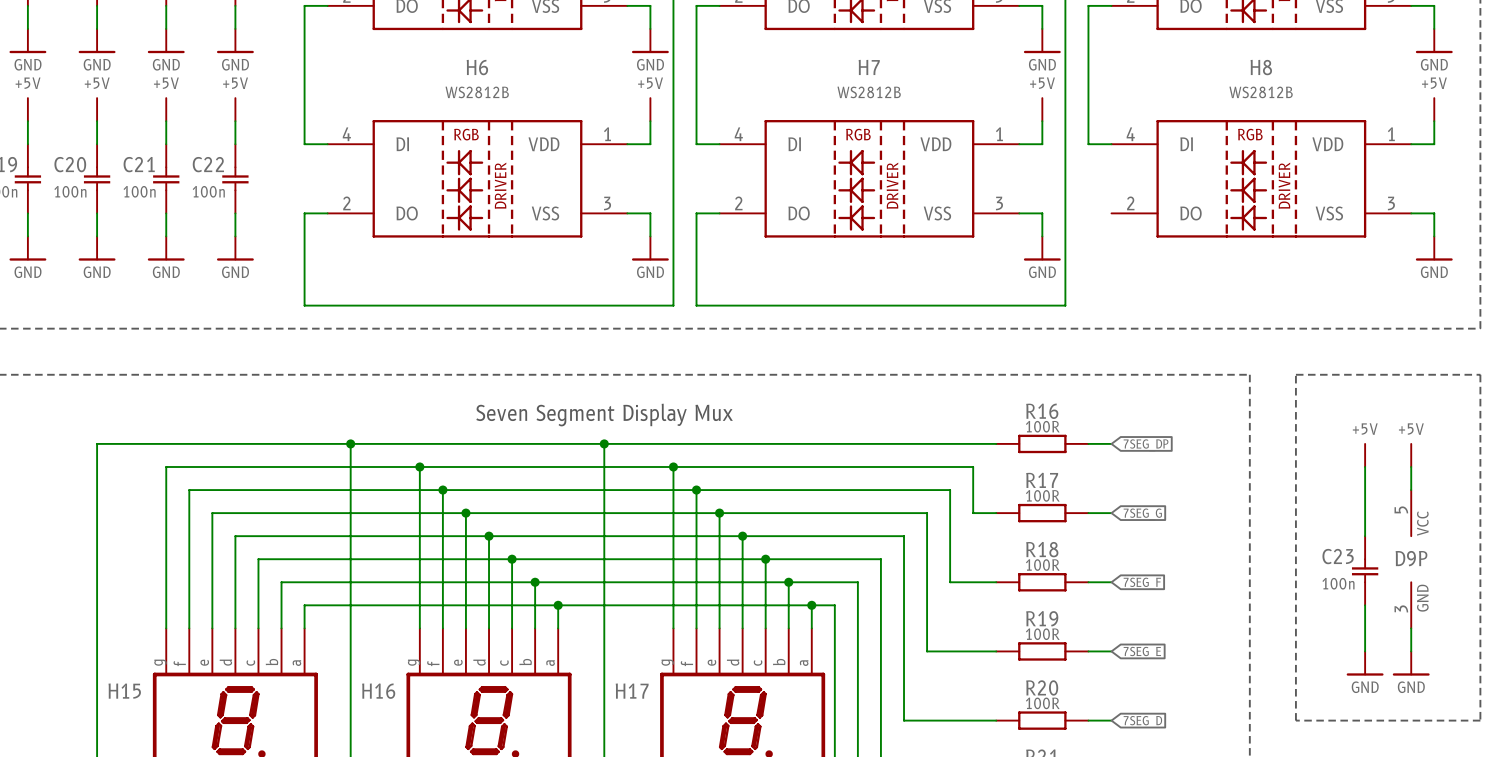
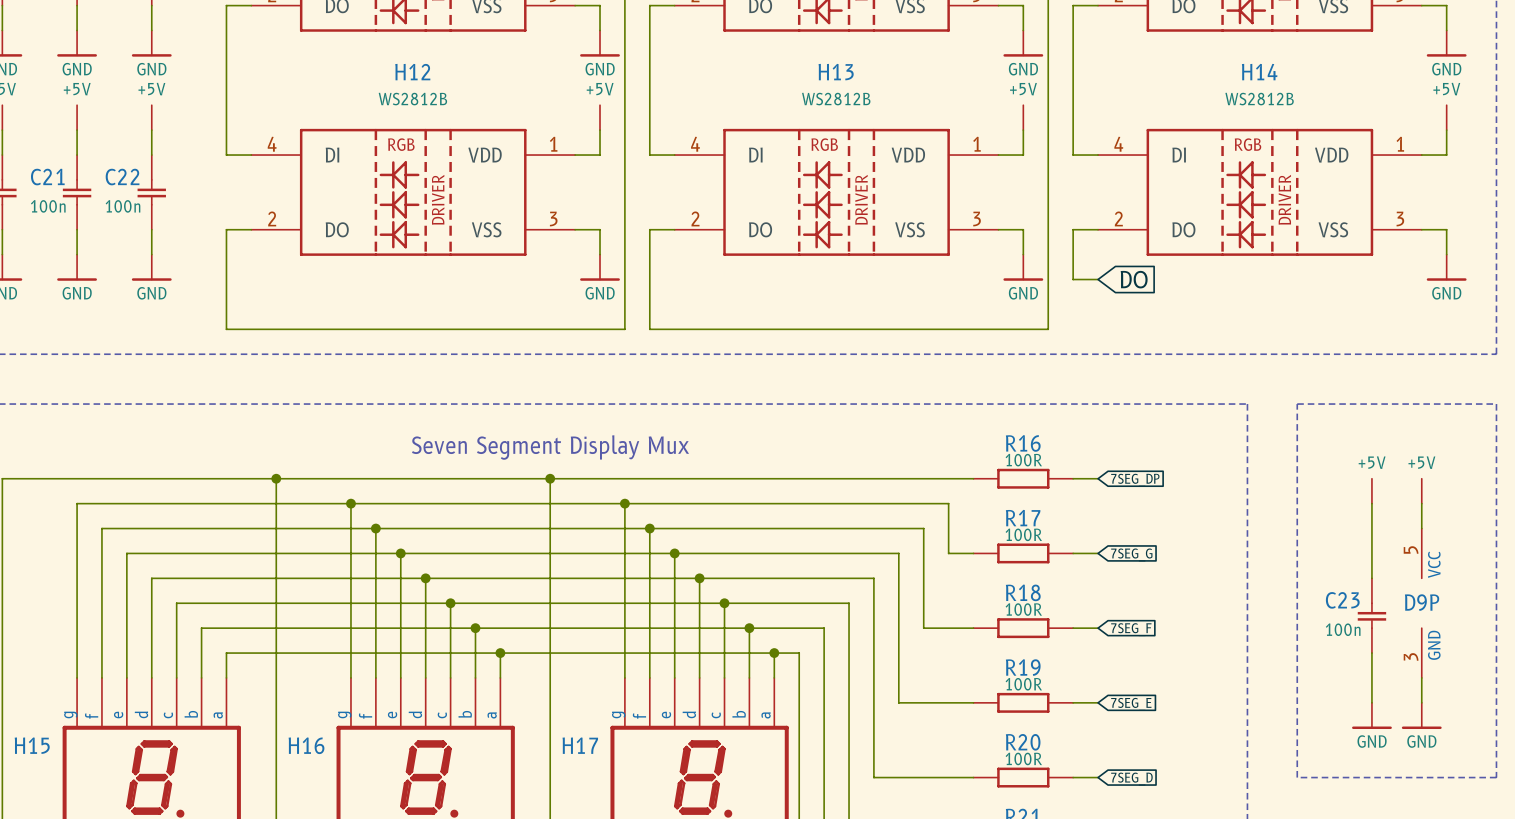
H6 name: H6 (477, 67) -> H12 (412, 72)
H7 name: H7 (869, 67) -> H13 (836, 72)
H8 name: H8 (1261, 67) -> H14 (1259, 72)
wire: none -> (1098, 229) (1073, 229) (1073, 279) (1098, 279)
global label: none -> DO (1134, 279)

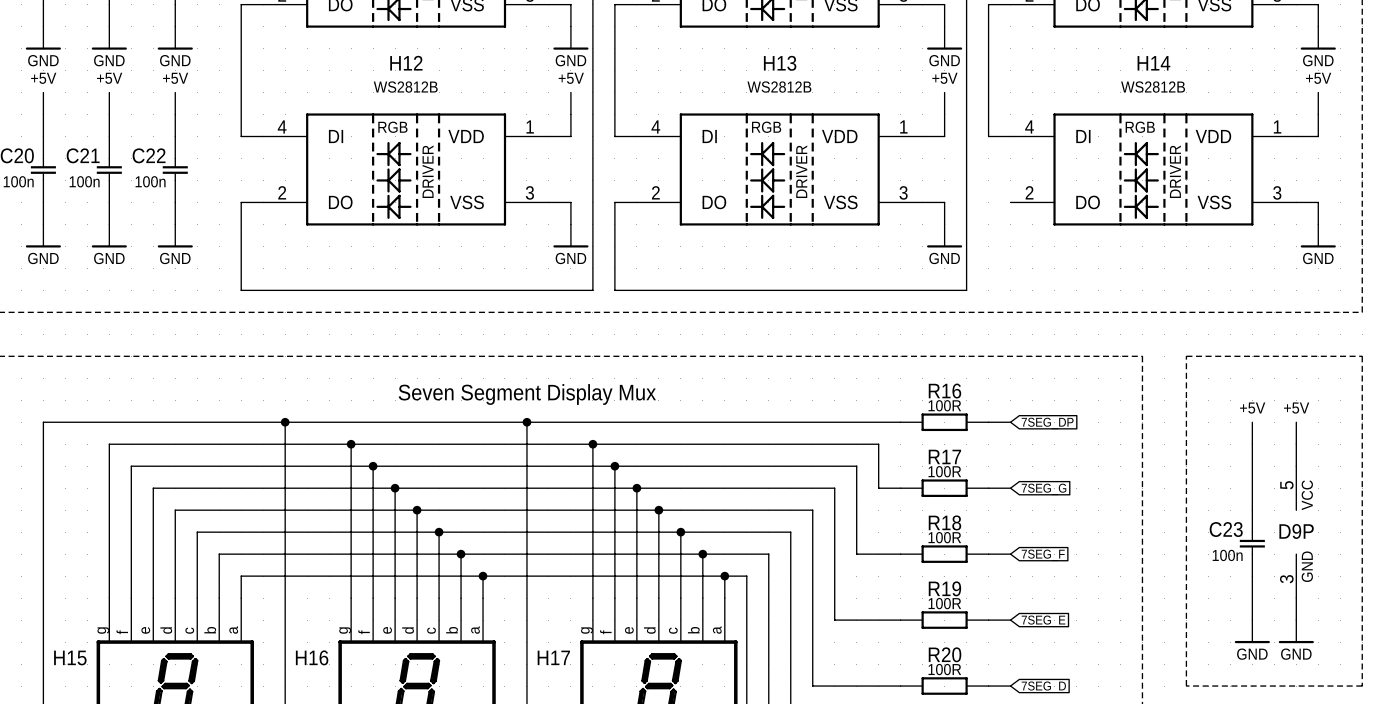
wire: (1098, 229) (1073, 229) (1073, 279) (1098, 279) -> none
global label: DO (1134, 279) -> none

